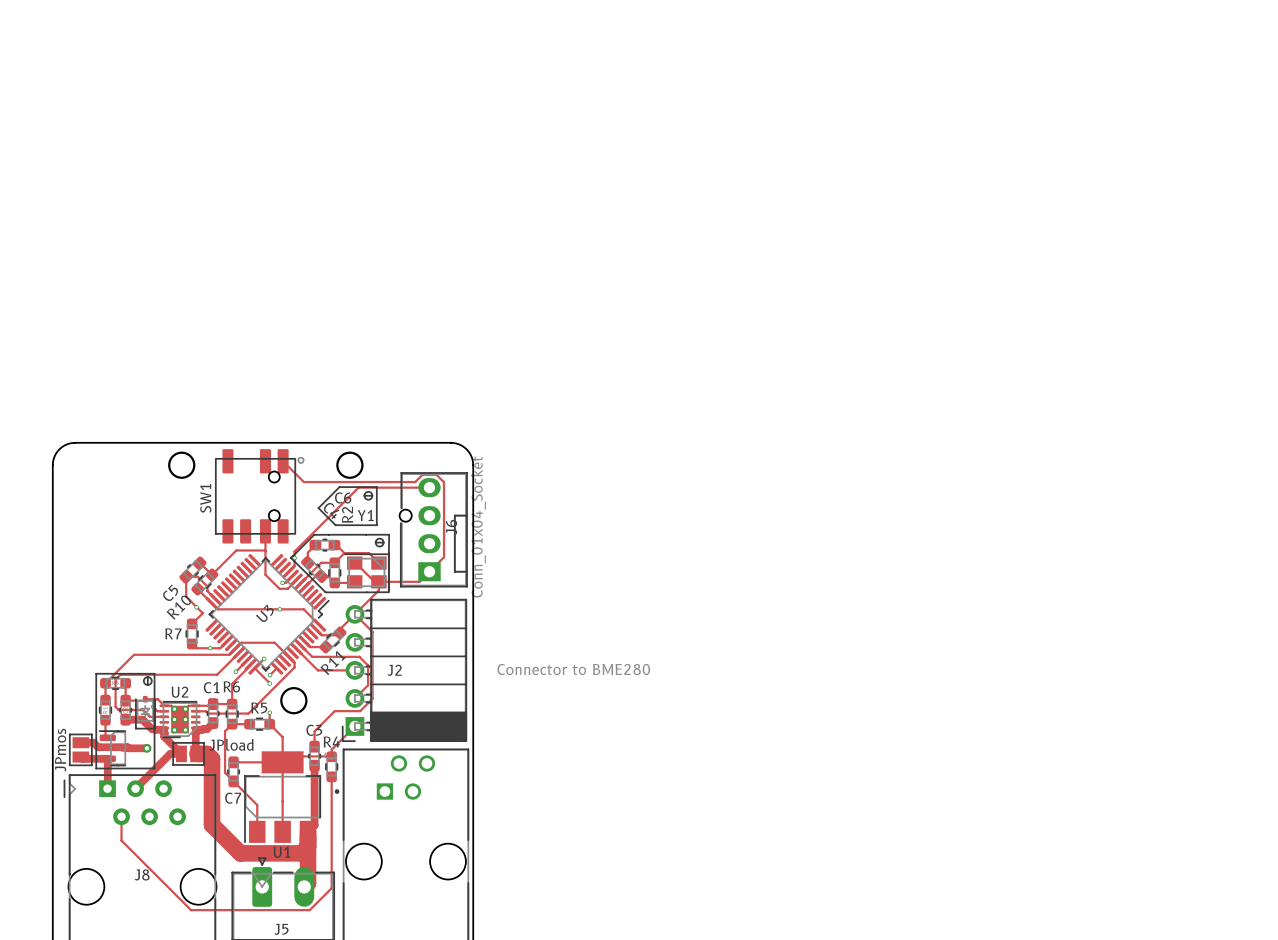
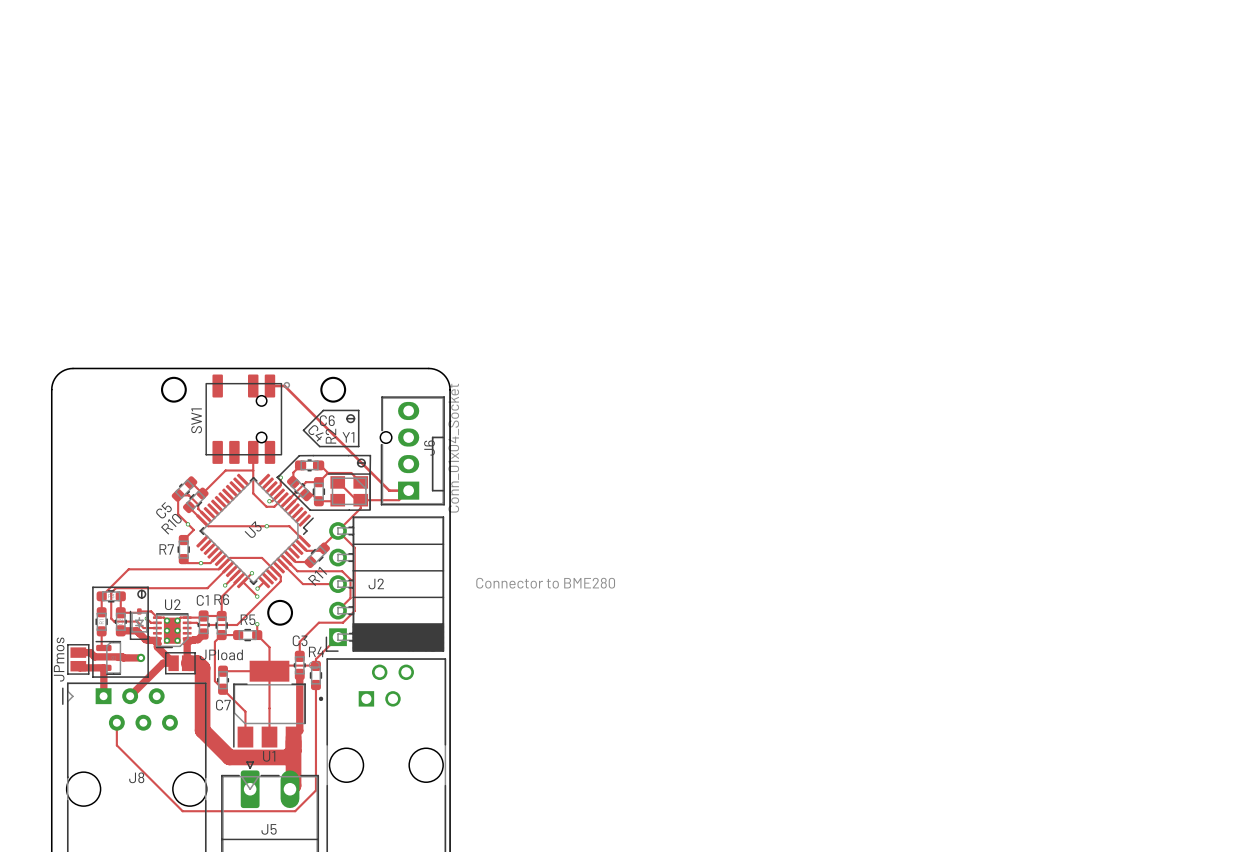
track: (283, 461) (303, 482) (415, 482) (422, 474) (436, 474) (444, 482) (444, 557) (429, 571) -> (269, 386) (284, 386) (389, 490) (408, 490)
track: (429, 487) (358, 487) (294, 551) (294, 558) -> none

